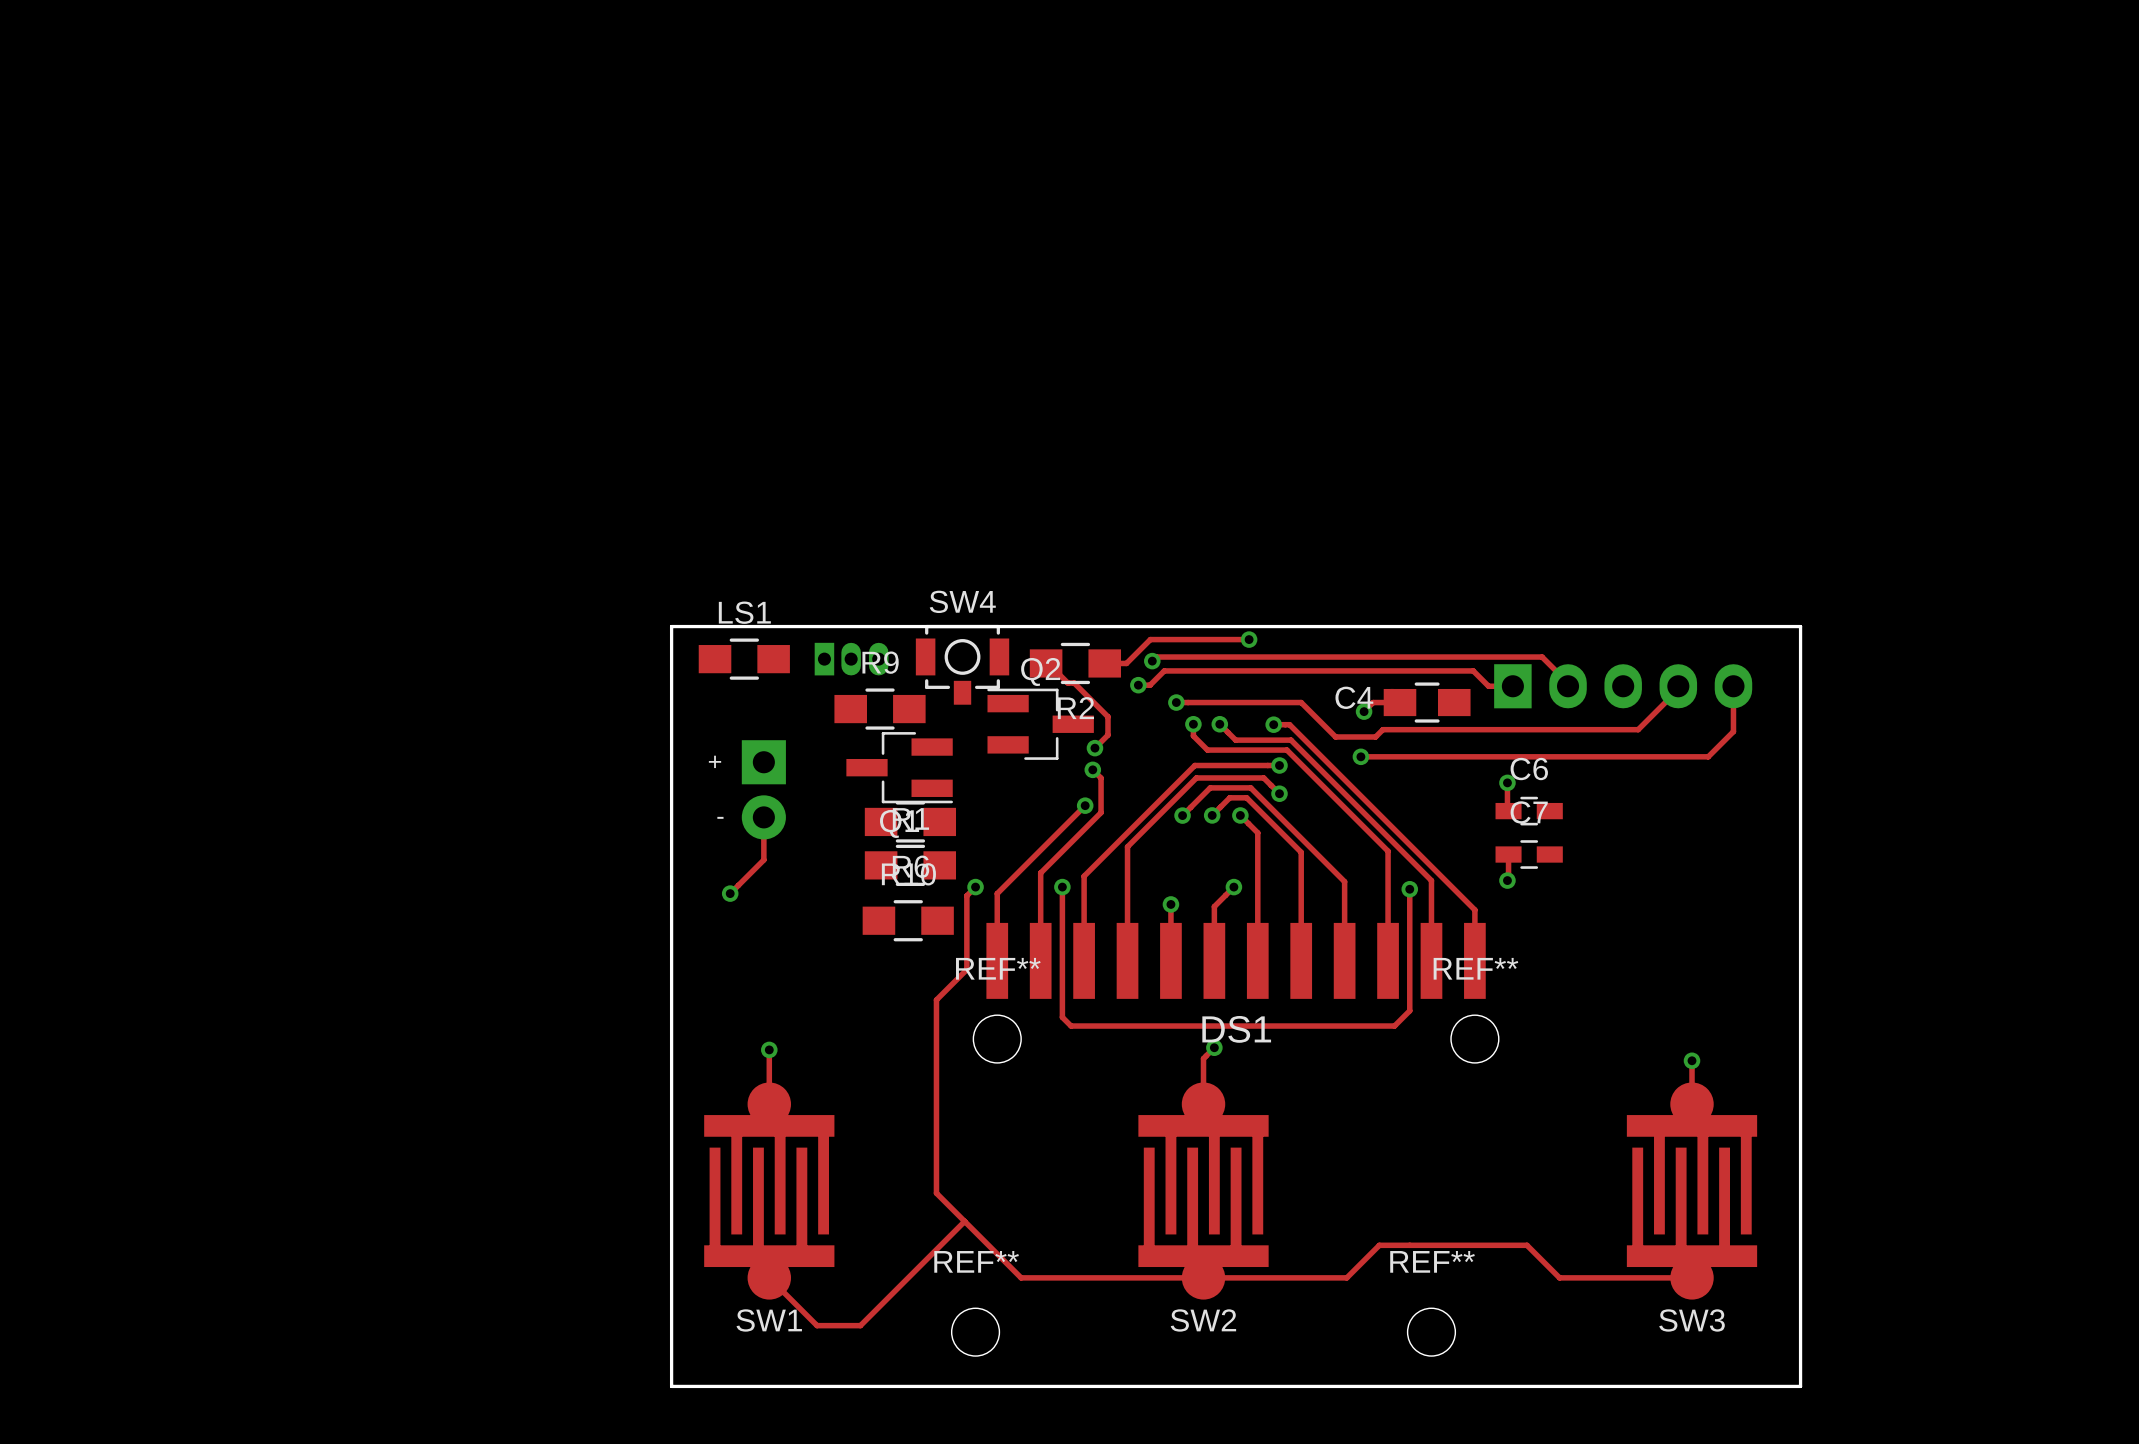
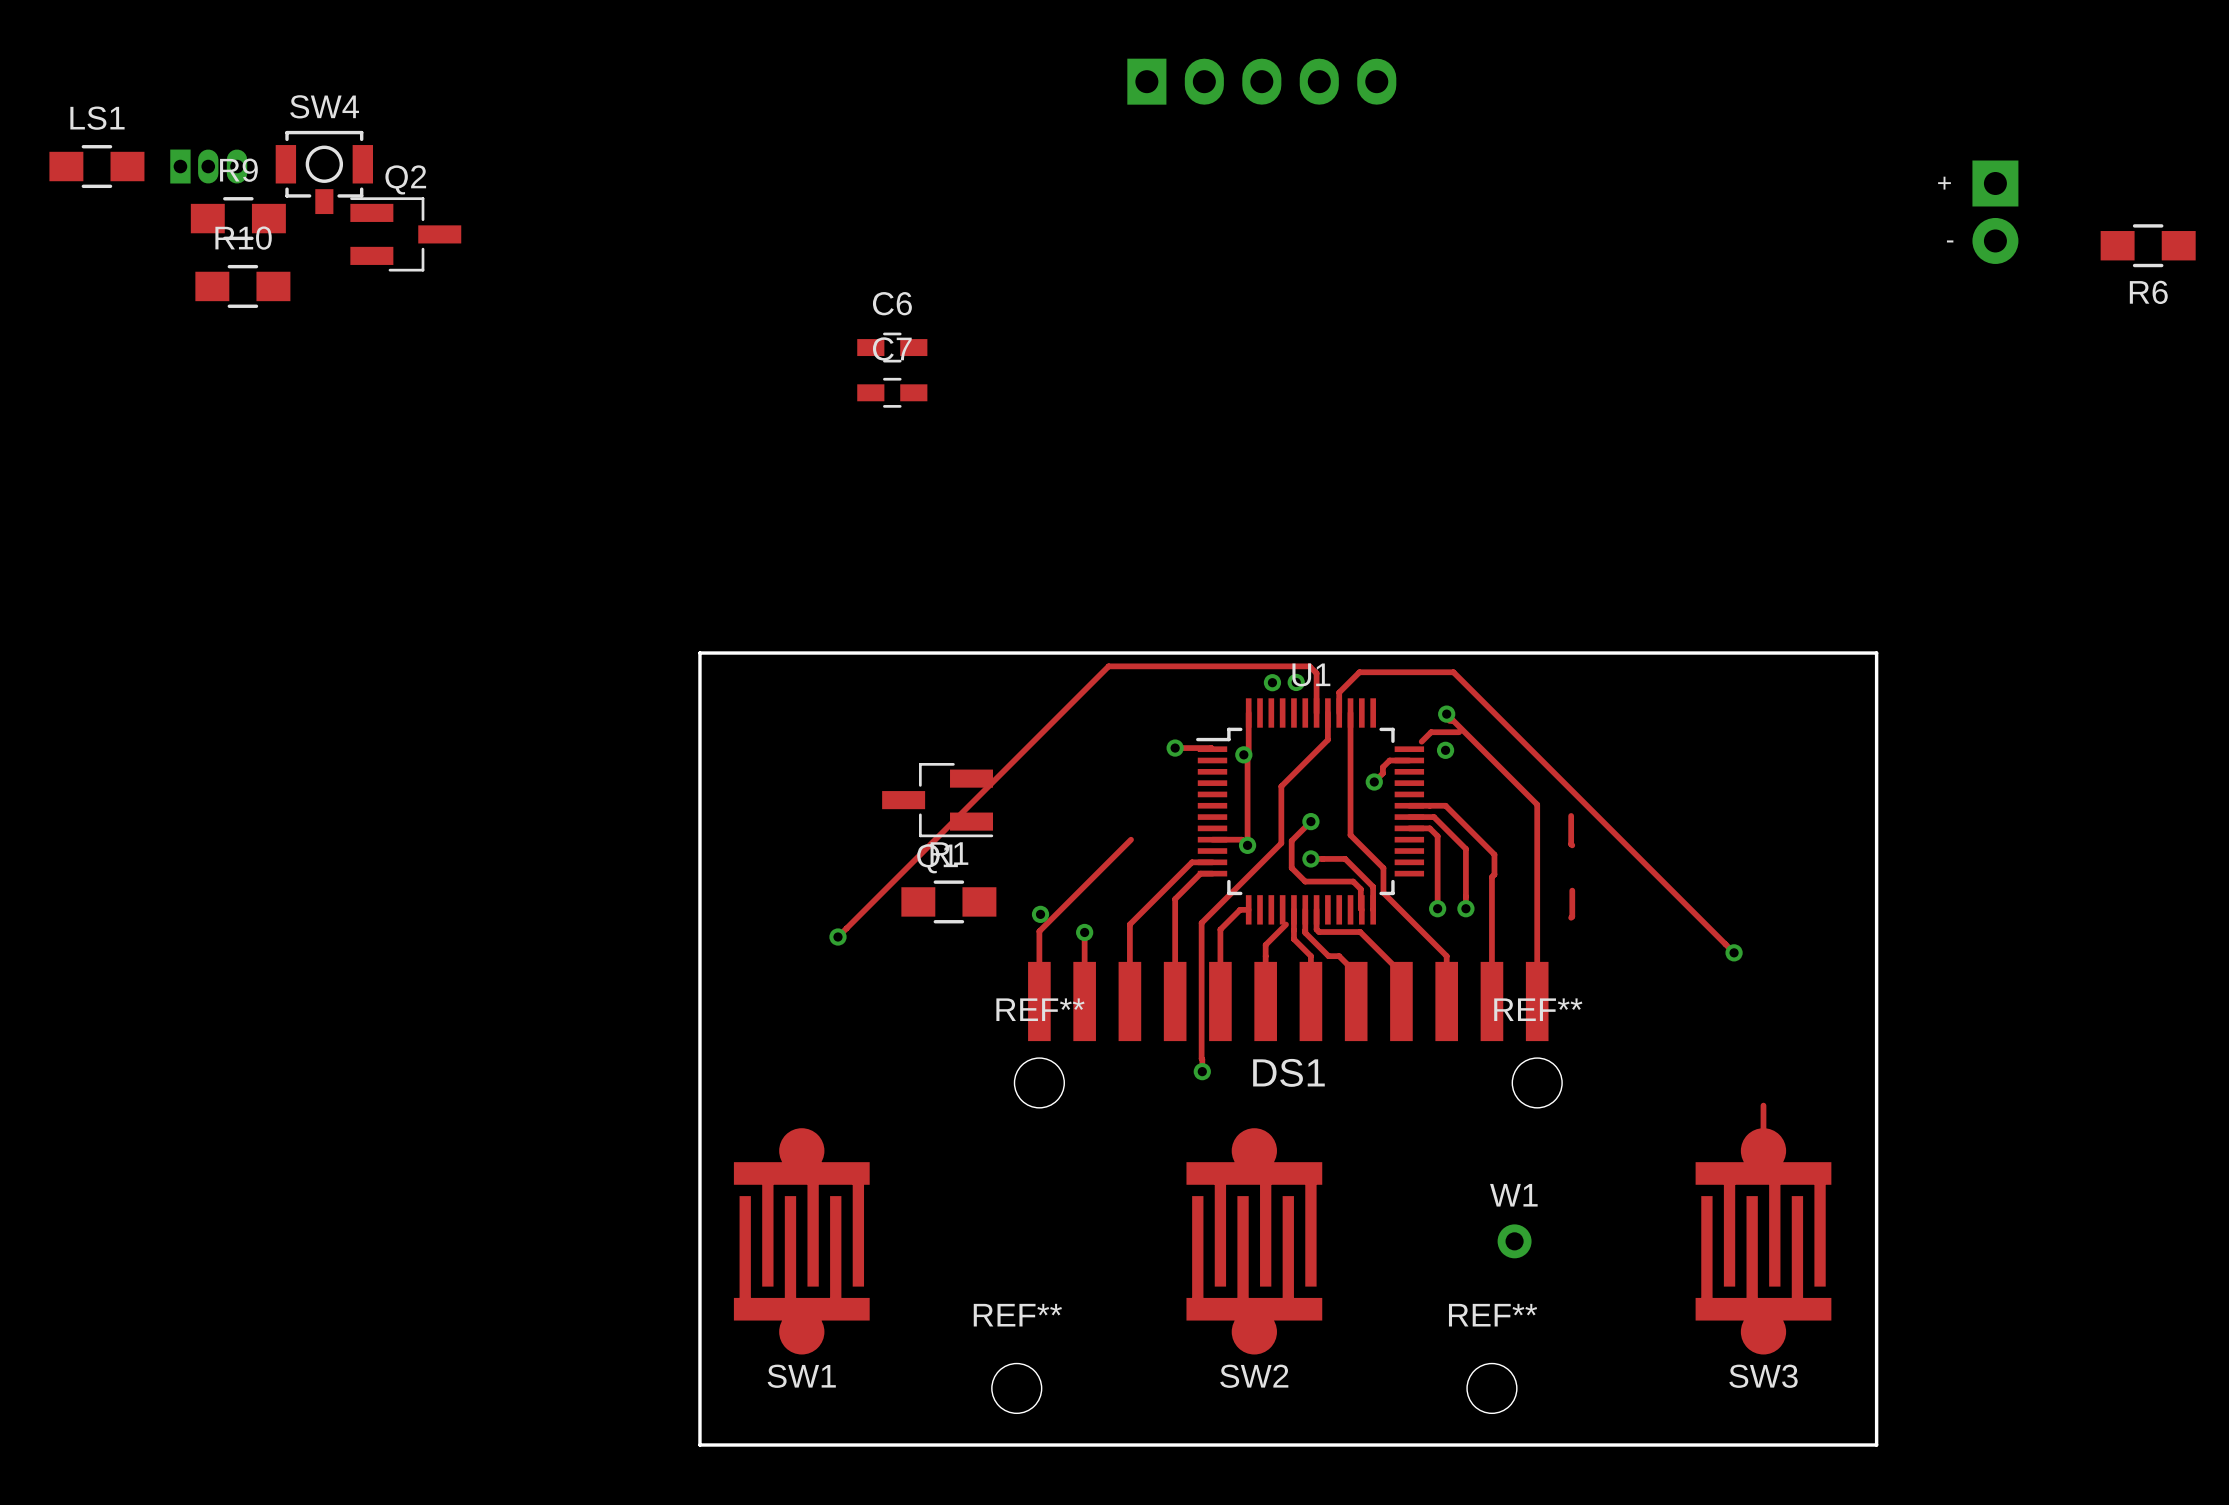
part: none -> (1261, 81)
part: none -> (208, 166)
text: none -> + (1944, 183)
part: none -> (1995, 212)
text: none -> - (1950, 241)
track: (1249, 639) (1150, 639) (1126, 663) (1104, 663) -> none
via position: (1249, 639) -> (1296, 682)
via: none -> (1272, 682)
LS1 position: (744, 659) -> (96, 166)
part: (851, 659) -> none
track: (1152, 661) (1156, 657) (1542, 657) (1568, 682) (1568, 689) -> none
via: (1152, 661) -> none
track: (1046, 663) (1067, 683) (1074, 683) (1107, 716) (1107, 735) (1094, 748) -> none
R2: (1075, 663) -> none
SW4 position: (962, 664) -> (324, 172)
track: none -> (1248, 712) (1247, 845) (1241, 839) (1212, 839)
track: none -> (1316, 712) (1316, 673) (1309, 666) (1108, 666) (838, 937)
track: none -> (1327, 712) (1327, 739) (1281, 786) (1281, 843) (1201, 922) (1202, 1071)
track: none -> (1339, 712) (1339, 692) (1359, 672) (1453, 672) (1734, 952)
track: (1138, 685) (1150, 685) (1164, 670) (1473, 670) (1488, 686) (1512, 686) -> none
via: (1138, 685) -> none
via: none -> (1446, 714)
part: (1623, 686) -> none
track: (1678, 686) (1678, 689) (1638, 729) (1382, 729) (1375, 736) (1335, 736) (1301, 702) (1176, 702) -> none
track: (1733, 686) (1733, 731) (1708, 756) (1360, 756) -> none
via: (1176, 702) -> none
C4: (1427, 702) -> none
R9 position: (880, 709) -> (238, 218)
via: (1364, 711) -> none
track: none -> (1175, 748) (1212, 749)
via: none -> (1175, 748)
via: none -> (1445, 750)
Q2 position: (1040, 724) -> (405, 234)
track: (1193, 724) (1193, 735) (1207, 750) (1286, 750) (1388, 851) (1388, 917) -> (1350, 712) (1350, 835) (1383, 868) (1383, 892) (1446, 956)
track: (1219, 724) (1235, 740) (1291, 740) (1431, 880) -> (1409, 805) (1445, 805) (1494, 854) (1494, 874) (1491, 877) (1491, 917)
via: (1219, 724) -> none
track: (1273, 724) (1289, 724) (1474, 909) -> (1446, 714) (1537, 804) (1537, 948)
via: (1273, 724) -> none
track: none -> (1409, 760) (1389, 760) (1382, 767) (1382, 773) (1374, 782)
via: (1094, 748) -> none
via: none -> (1374, 782)
via: (1360, 756) -> none
text: + (715, 761) -> none
track: (1279, 765) (1194, 765) (1084, 876) (1084, 886) -> (1212, 862) (1192, 862) (1129, 924)
via: (1279, 765) -> none
track: (1092, 769) (1101, 778) (1101, 812) (1040, 873) (1040, 894) -> none
via: (1092, 769) -> none
U1: none -> (1310, 811)
via: (1507, 782) -> none
track: none -> (1409, 817) (1433, 817) (1465, 849) (1465, 908)
track: none -> (1310, 821) (1291, 840) (1291, 867) (1305, 881) (1353, 881) (1360, 889) (1361, 909)
via: none -> (1310, 821)
part: (763, 789) -> none
track: (1279, 793) (1263, 777) (1196, 777) (1127, 846) (1127, 862) -> (1212, 873) (1200, 873) (1175, 899)
via: (1279, 793) -> none
track: none -> (1409, 828) (1429, 828) (1437, 836) (1437, 908)
via: (1085, 805) -> none
via: none -> (1247, 845)
C6 position: (1529, 811) -> (892, 347)
track: (1182, 815) (1210, 787) (1250, 787) (1344, 881) (1344, 933) -> (1316, 909) (1316, 929) (1319, 932) (1360, 932) (1401, 973)
via: (1182, 815) -> none
track: (1212, 815) (1229, 797) (1246, 797) (1301, 852) (1301, 933) -> (1305, 909) (1305, 932) (1328, 956) (1339, 956) (1356, 973)
via: (1212, 815) -> none
track: (1240, 815) (1257, 832) (1257, 917) -> (1293, 909) (1293, 939) (1310, 956)
via: (1240, 815) -> none
text: - (720, 817) -> none
track: (763, 817) (763, 859) (730, 893) -> none
R6 position: (910, 821) -> (2148, 245)
track: none -> (1310, 858) (1345, 858) (1373, 886) (1373, 909)
via: none -> (1310, 858)
C7 position: (1529, 854) -> (892, 392)
via: none -> (1437, 908)
via: none -> (1465, 908)
track: none -> (1248, 909) (1240, 909) (1220, 929) (1220, 942)
via: (1507, 880) -> none
track: (975, 887) (966, 895) (966, 969) (936, 999) (936, 1193) (1021, 1277) (1346, 1277) (1379, 1245) (1527, 1245) (1559, 1277) (1692, 1277) -> none
via position: (975, 887) -> (1040, 914)
track: (1062, 887) (1062, 1017) (1071, 1026) (1394, 1026) (1409, 1010) (1409, 889) -> none
via position: (1062, 887) -> (1084, 932)
via: (1233, 887) -> none
via: (1409, 889) -> none
via position: (730, 893) -> (838, 937)
via: (1170, 904) -> none
via: none -> (1734, 952)
R10 position: (908, 920) -> (242, 286)
via: none -> (1202, 1071)
track: (1214, 1047) (1203, 1058) (1203, 1104) -> none
via: (1214, 1047) -> none
track: (769, 1049) (769, 1104) -> none
via: (769, 1049) -> none
via: (1692, 1060) -> none
W1: none -> (1514, 1241)
track: (964, 1221) (860, 1325) (817, 1325) (769, 1277) -> none

